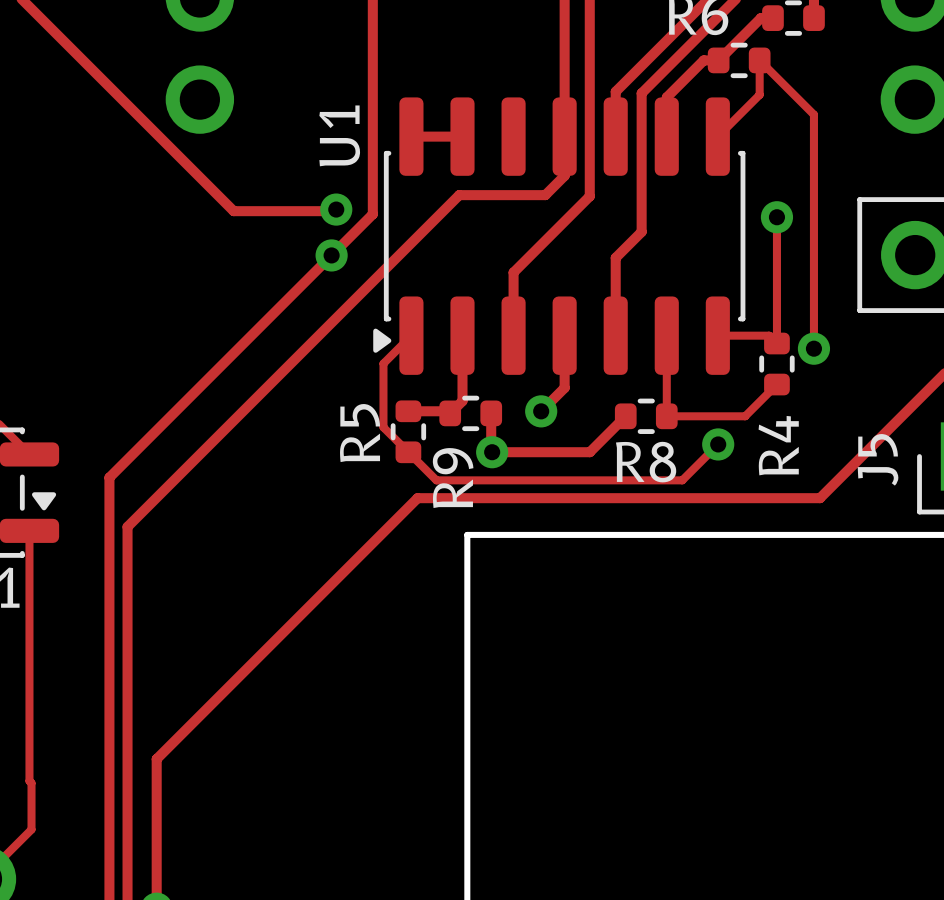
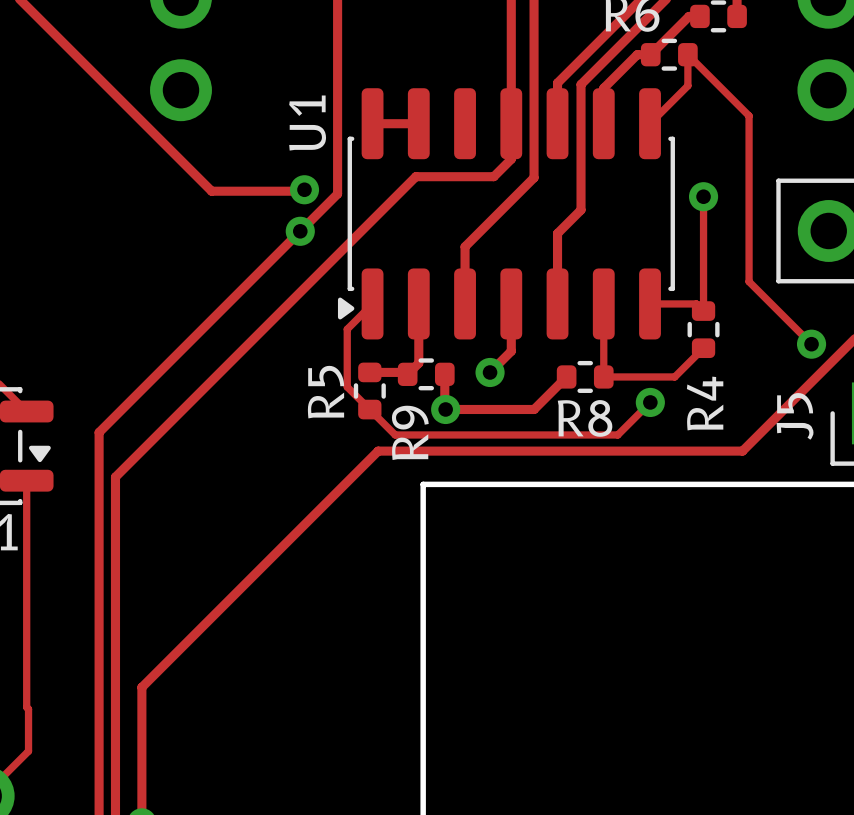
track: (813, 114) (813, 348) -> (737, 103) (749, 115) (749, 281) (811, 344)
via position: (813, 348) -> (811, 344)

